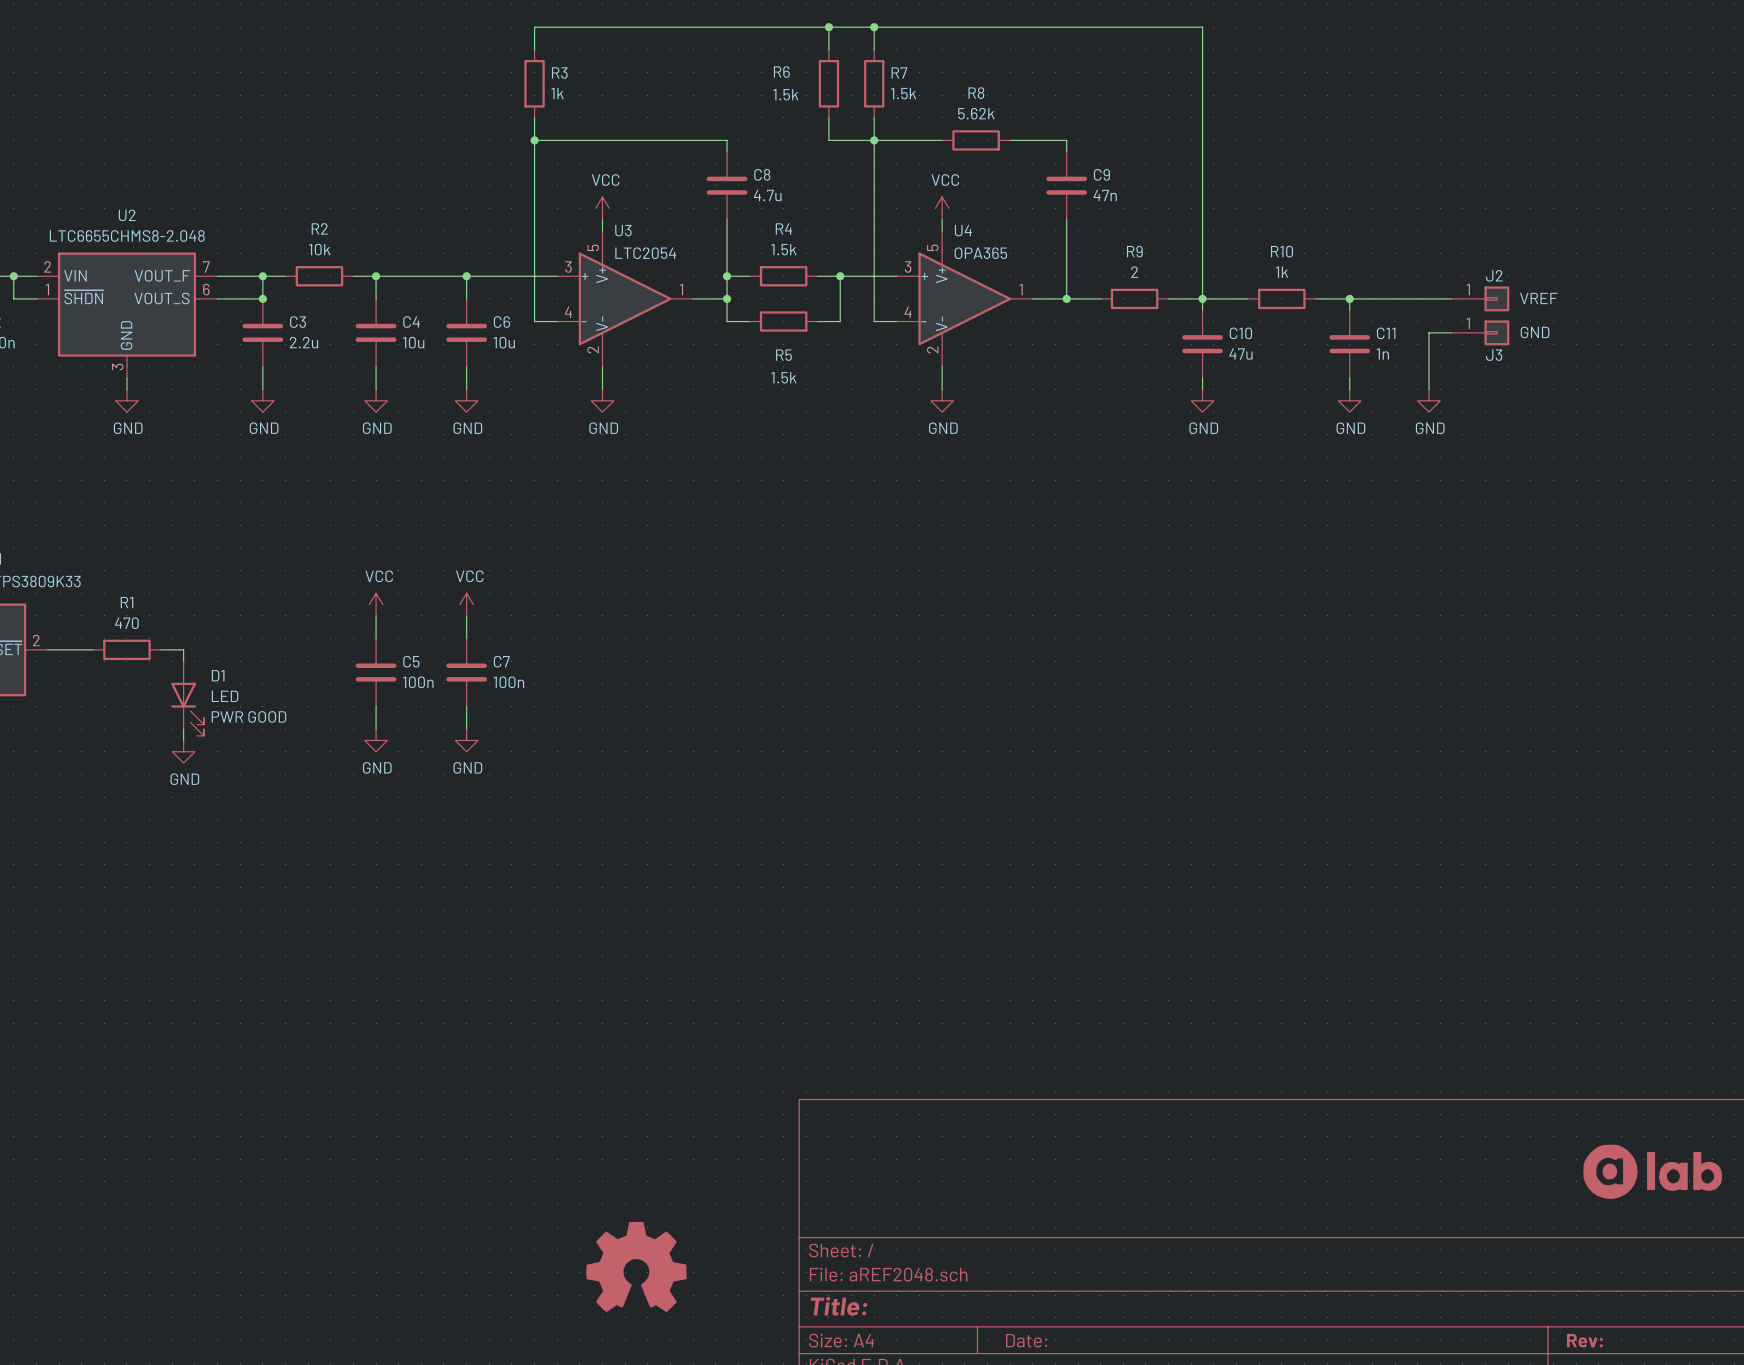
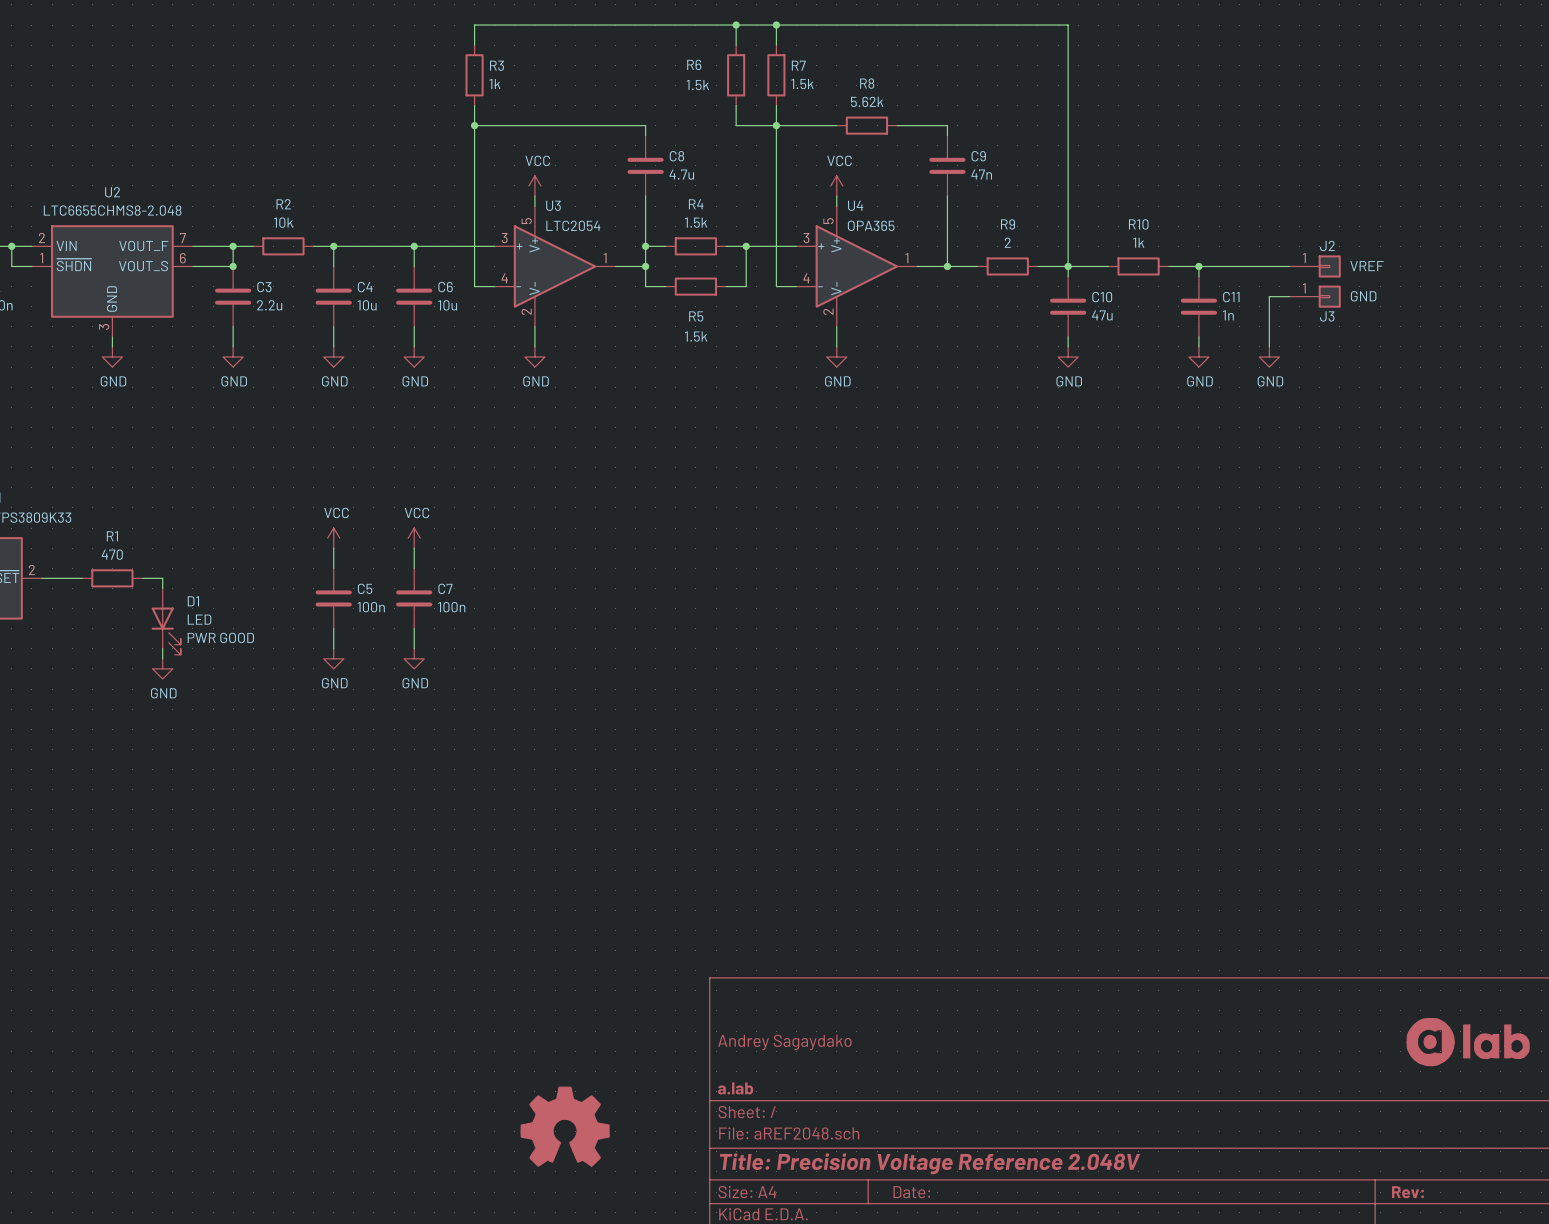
title block: none -> Andrey Sagaydako (784, 1042)
title block: none -> a.lab (735, 1088)
title block: Title: (838, 1306) -> Title: Precision Voltage Reference 2.048V (930, 1163)

